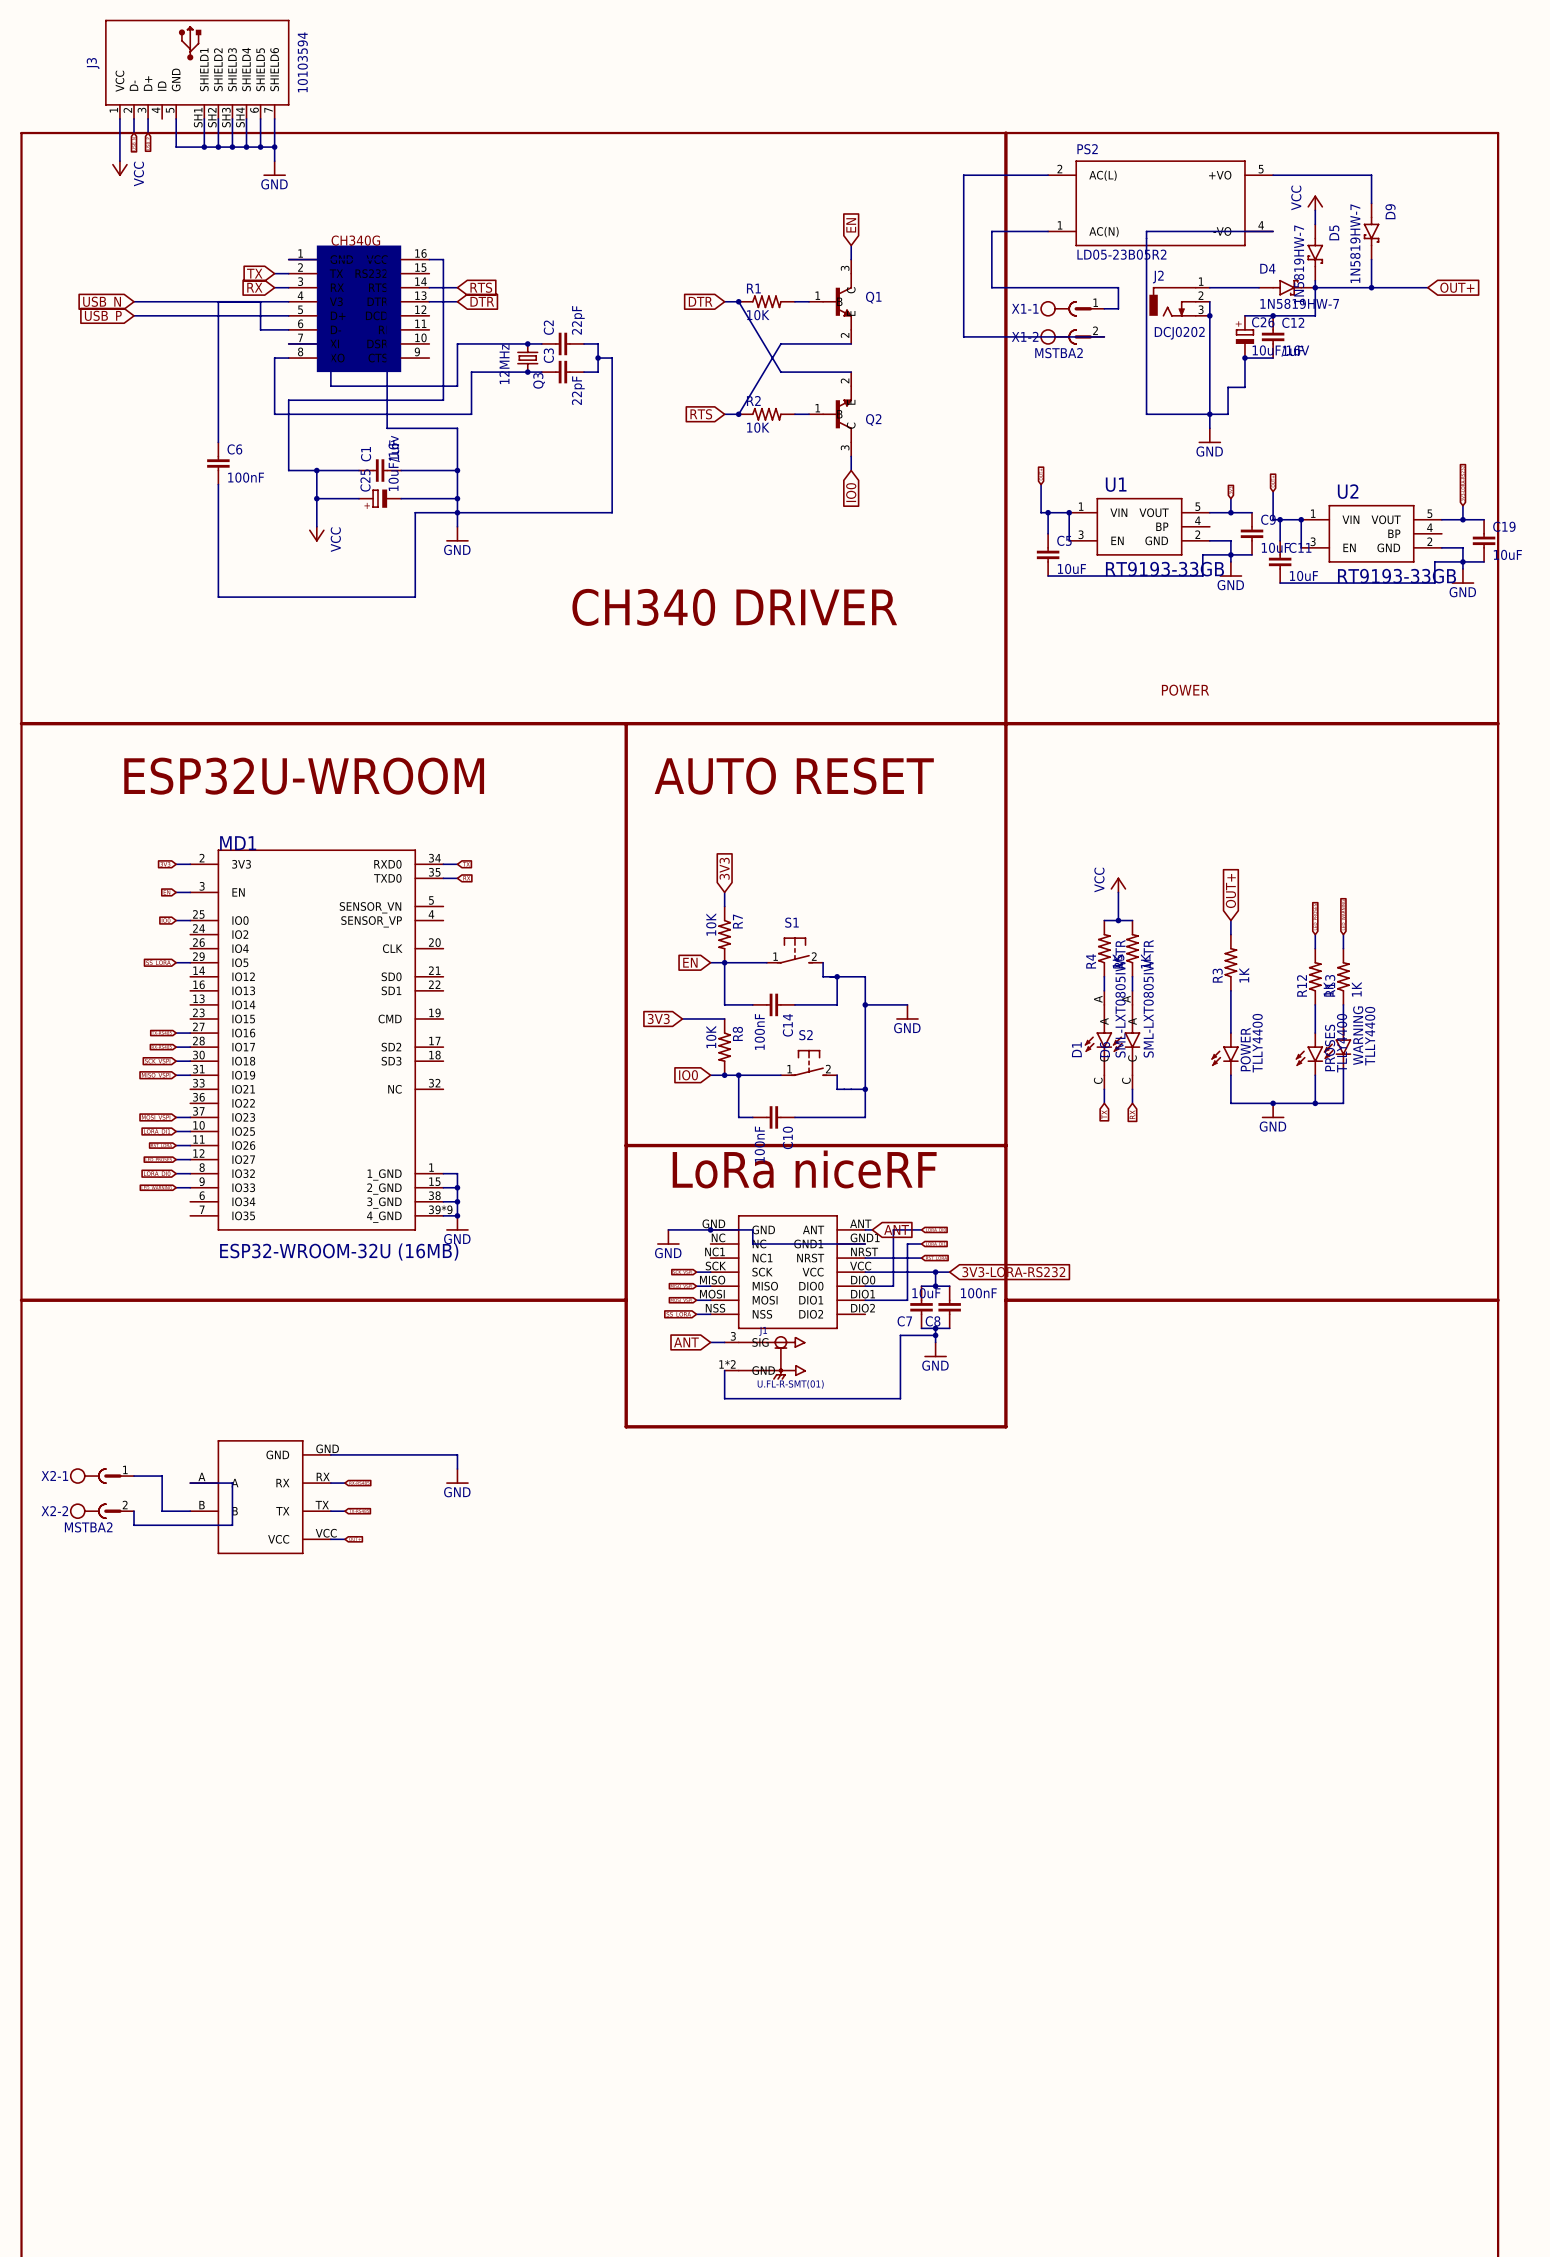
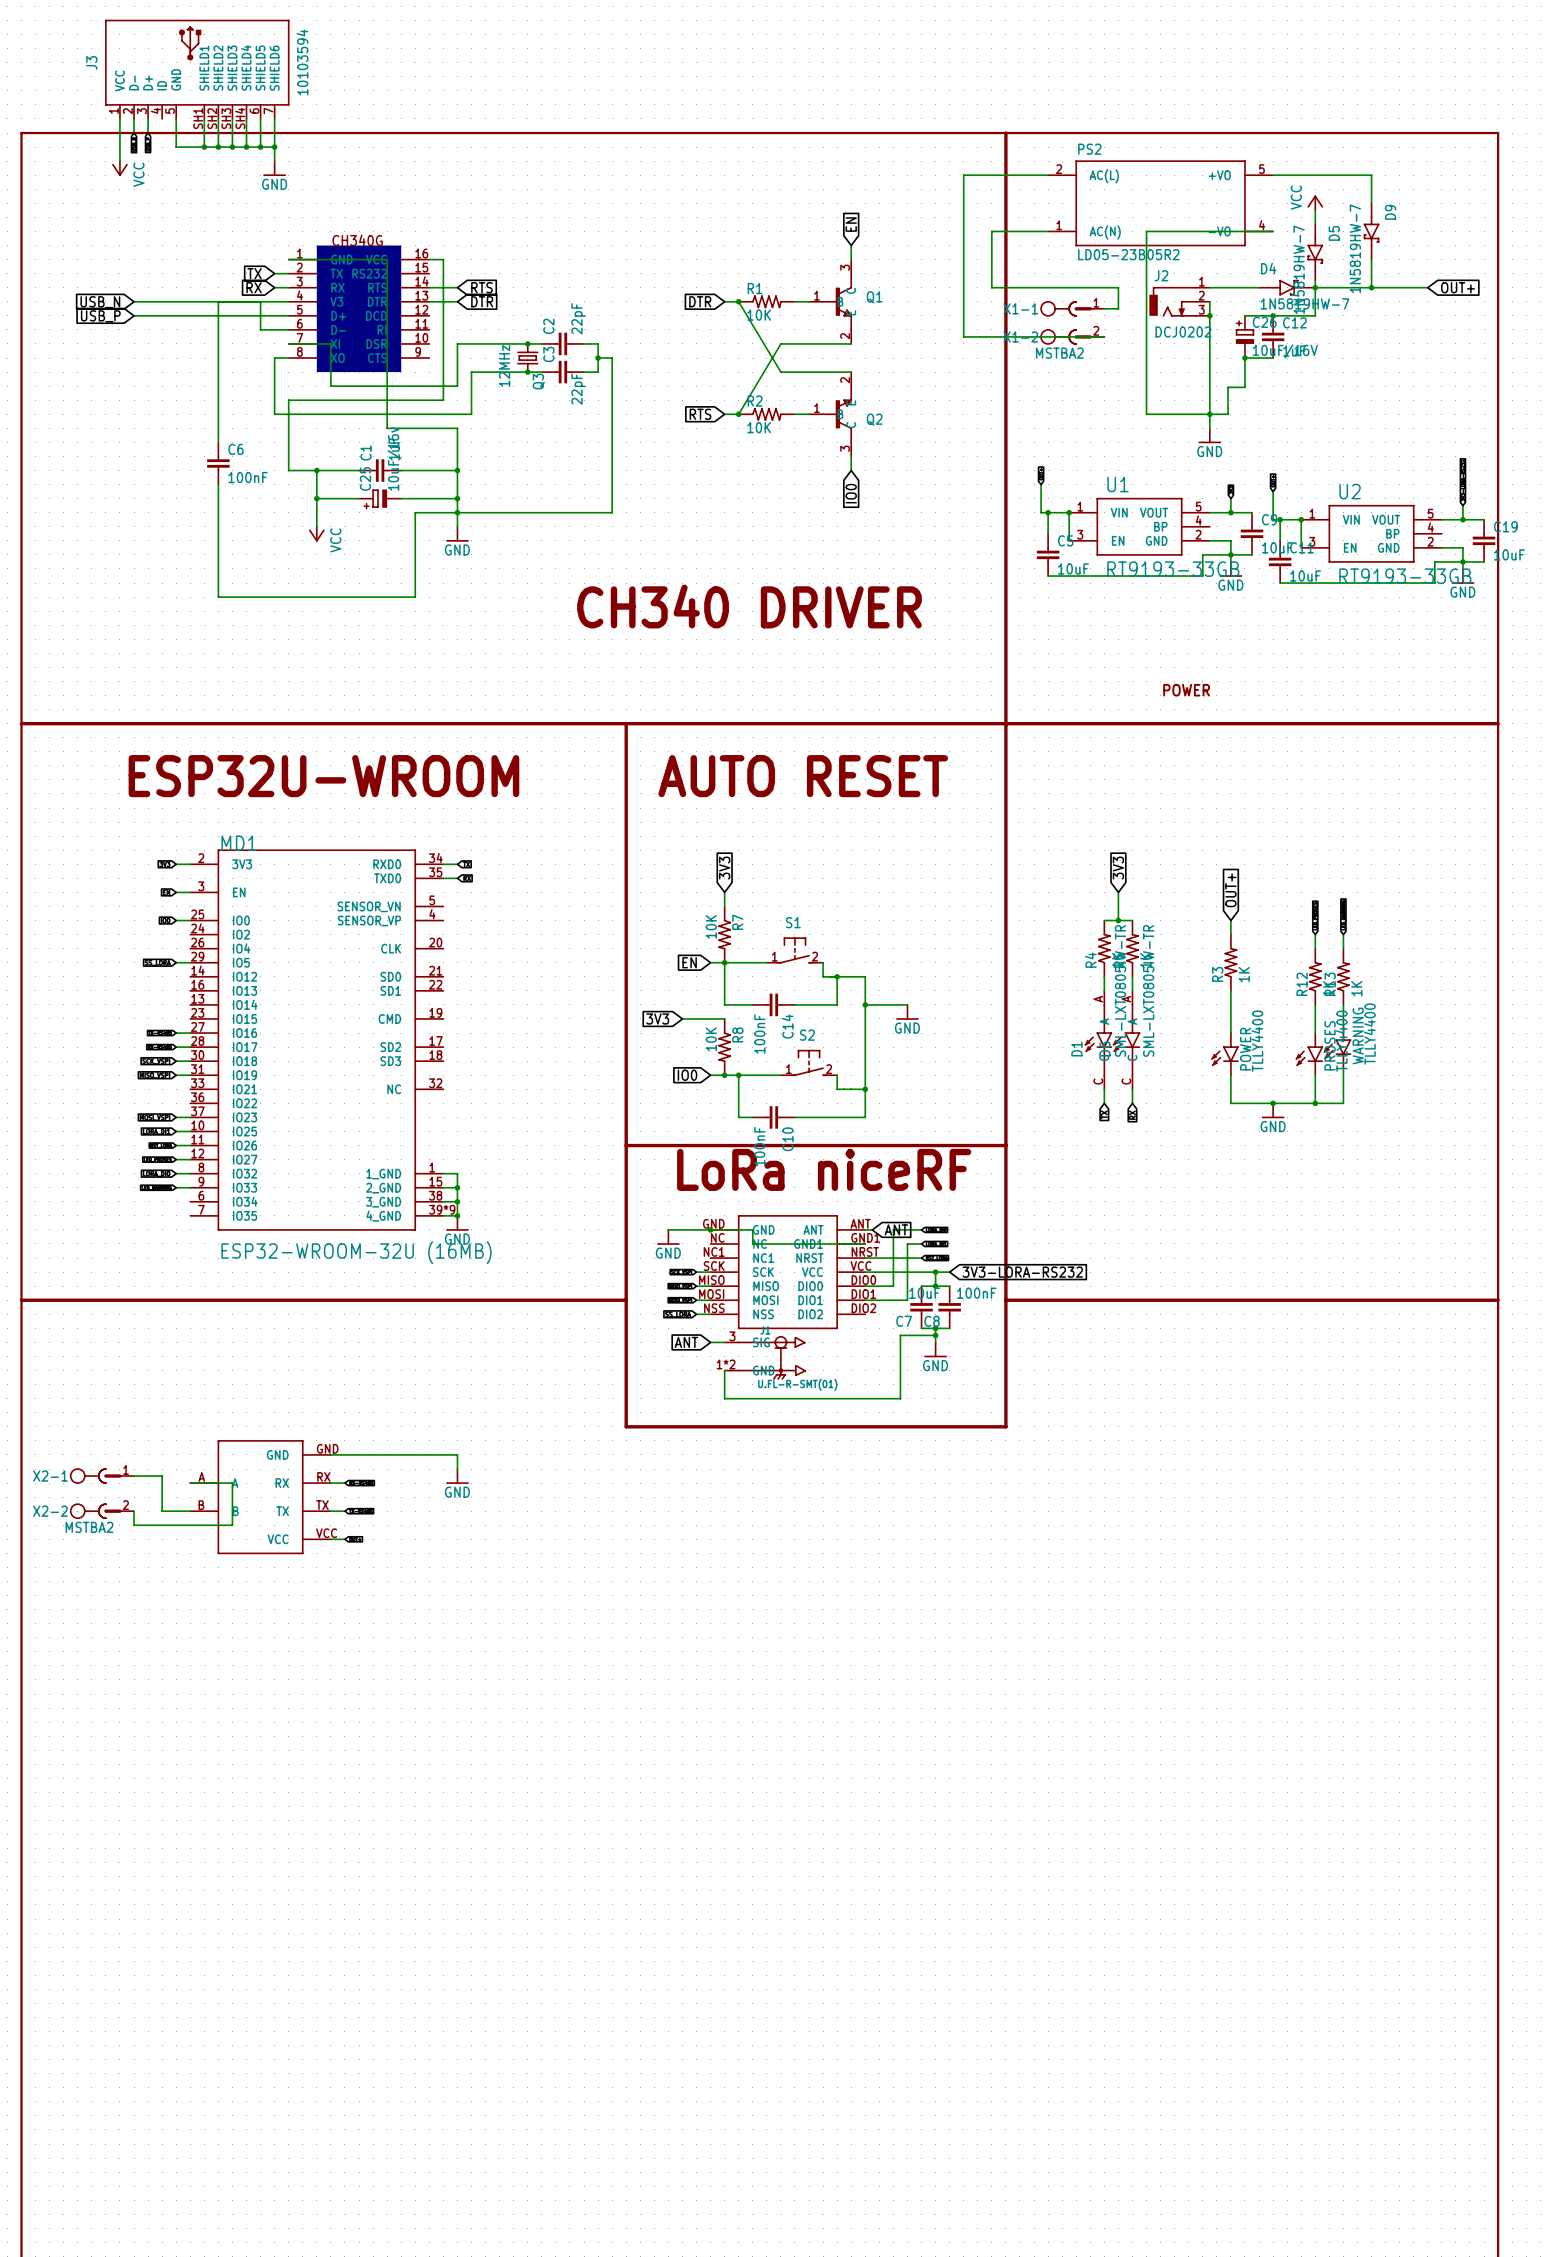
global label: none -> 3V3 (1118, 868)
power symbol: VCC (1118, 885) -> none

